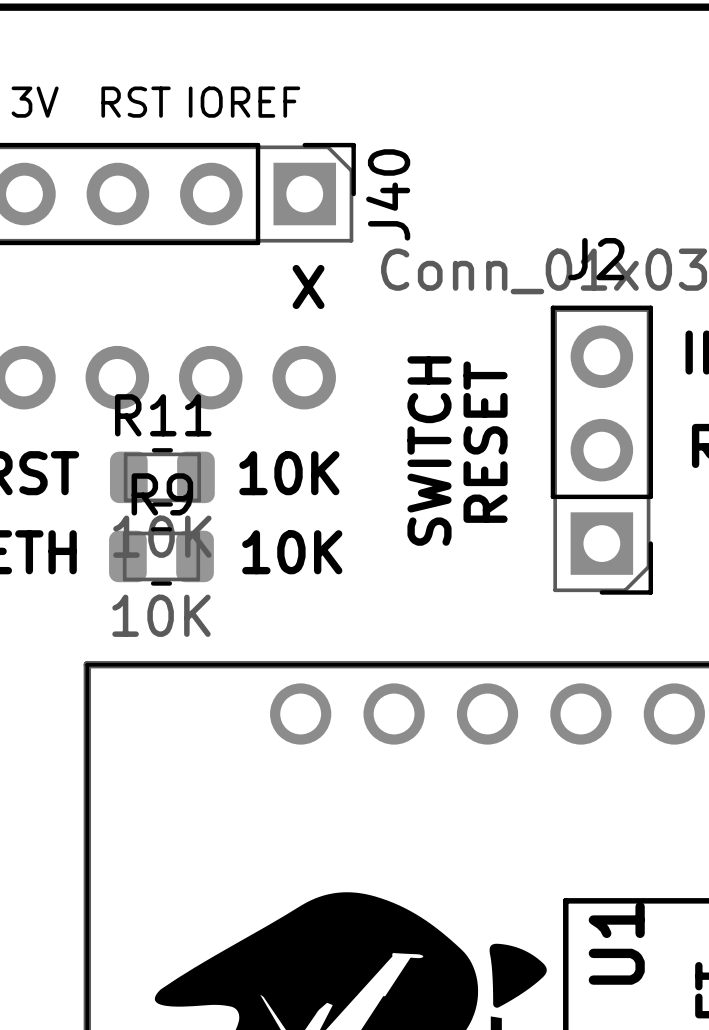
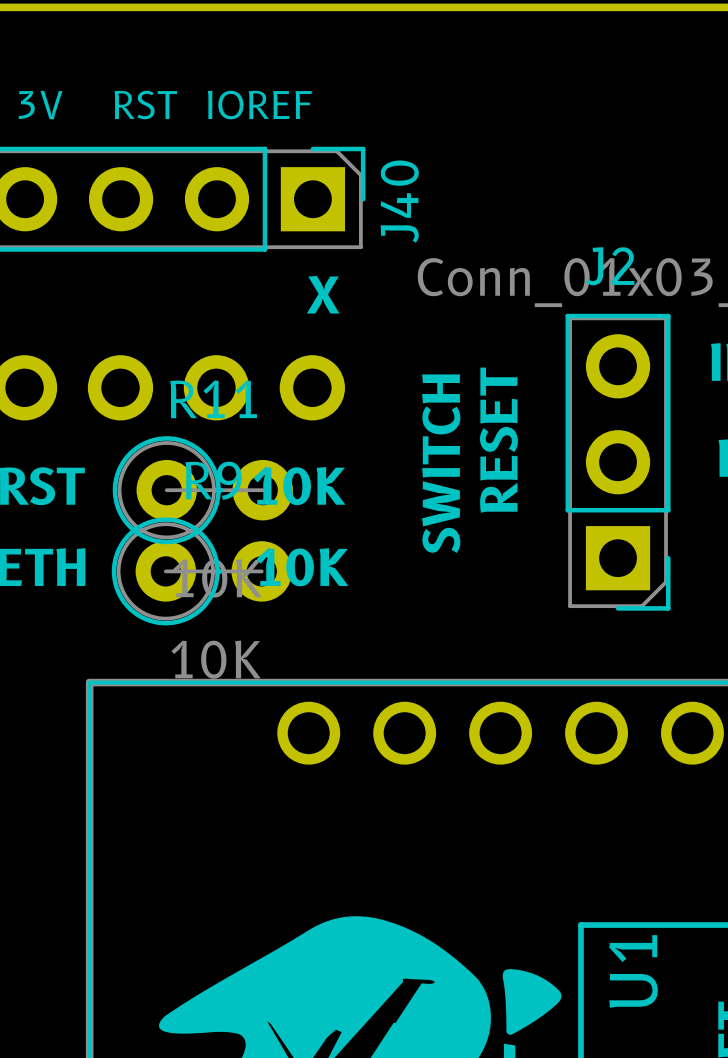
R11 footprint: [109, 448, 215, 507] -> [112, 436, 293, 545]
R9 footprint: [109, 527, 214, 586] -> [111, 517, 292, 626]

